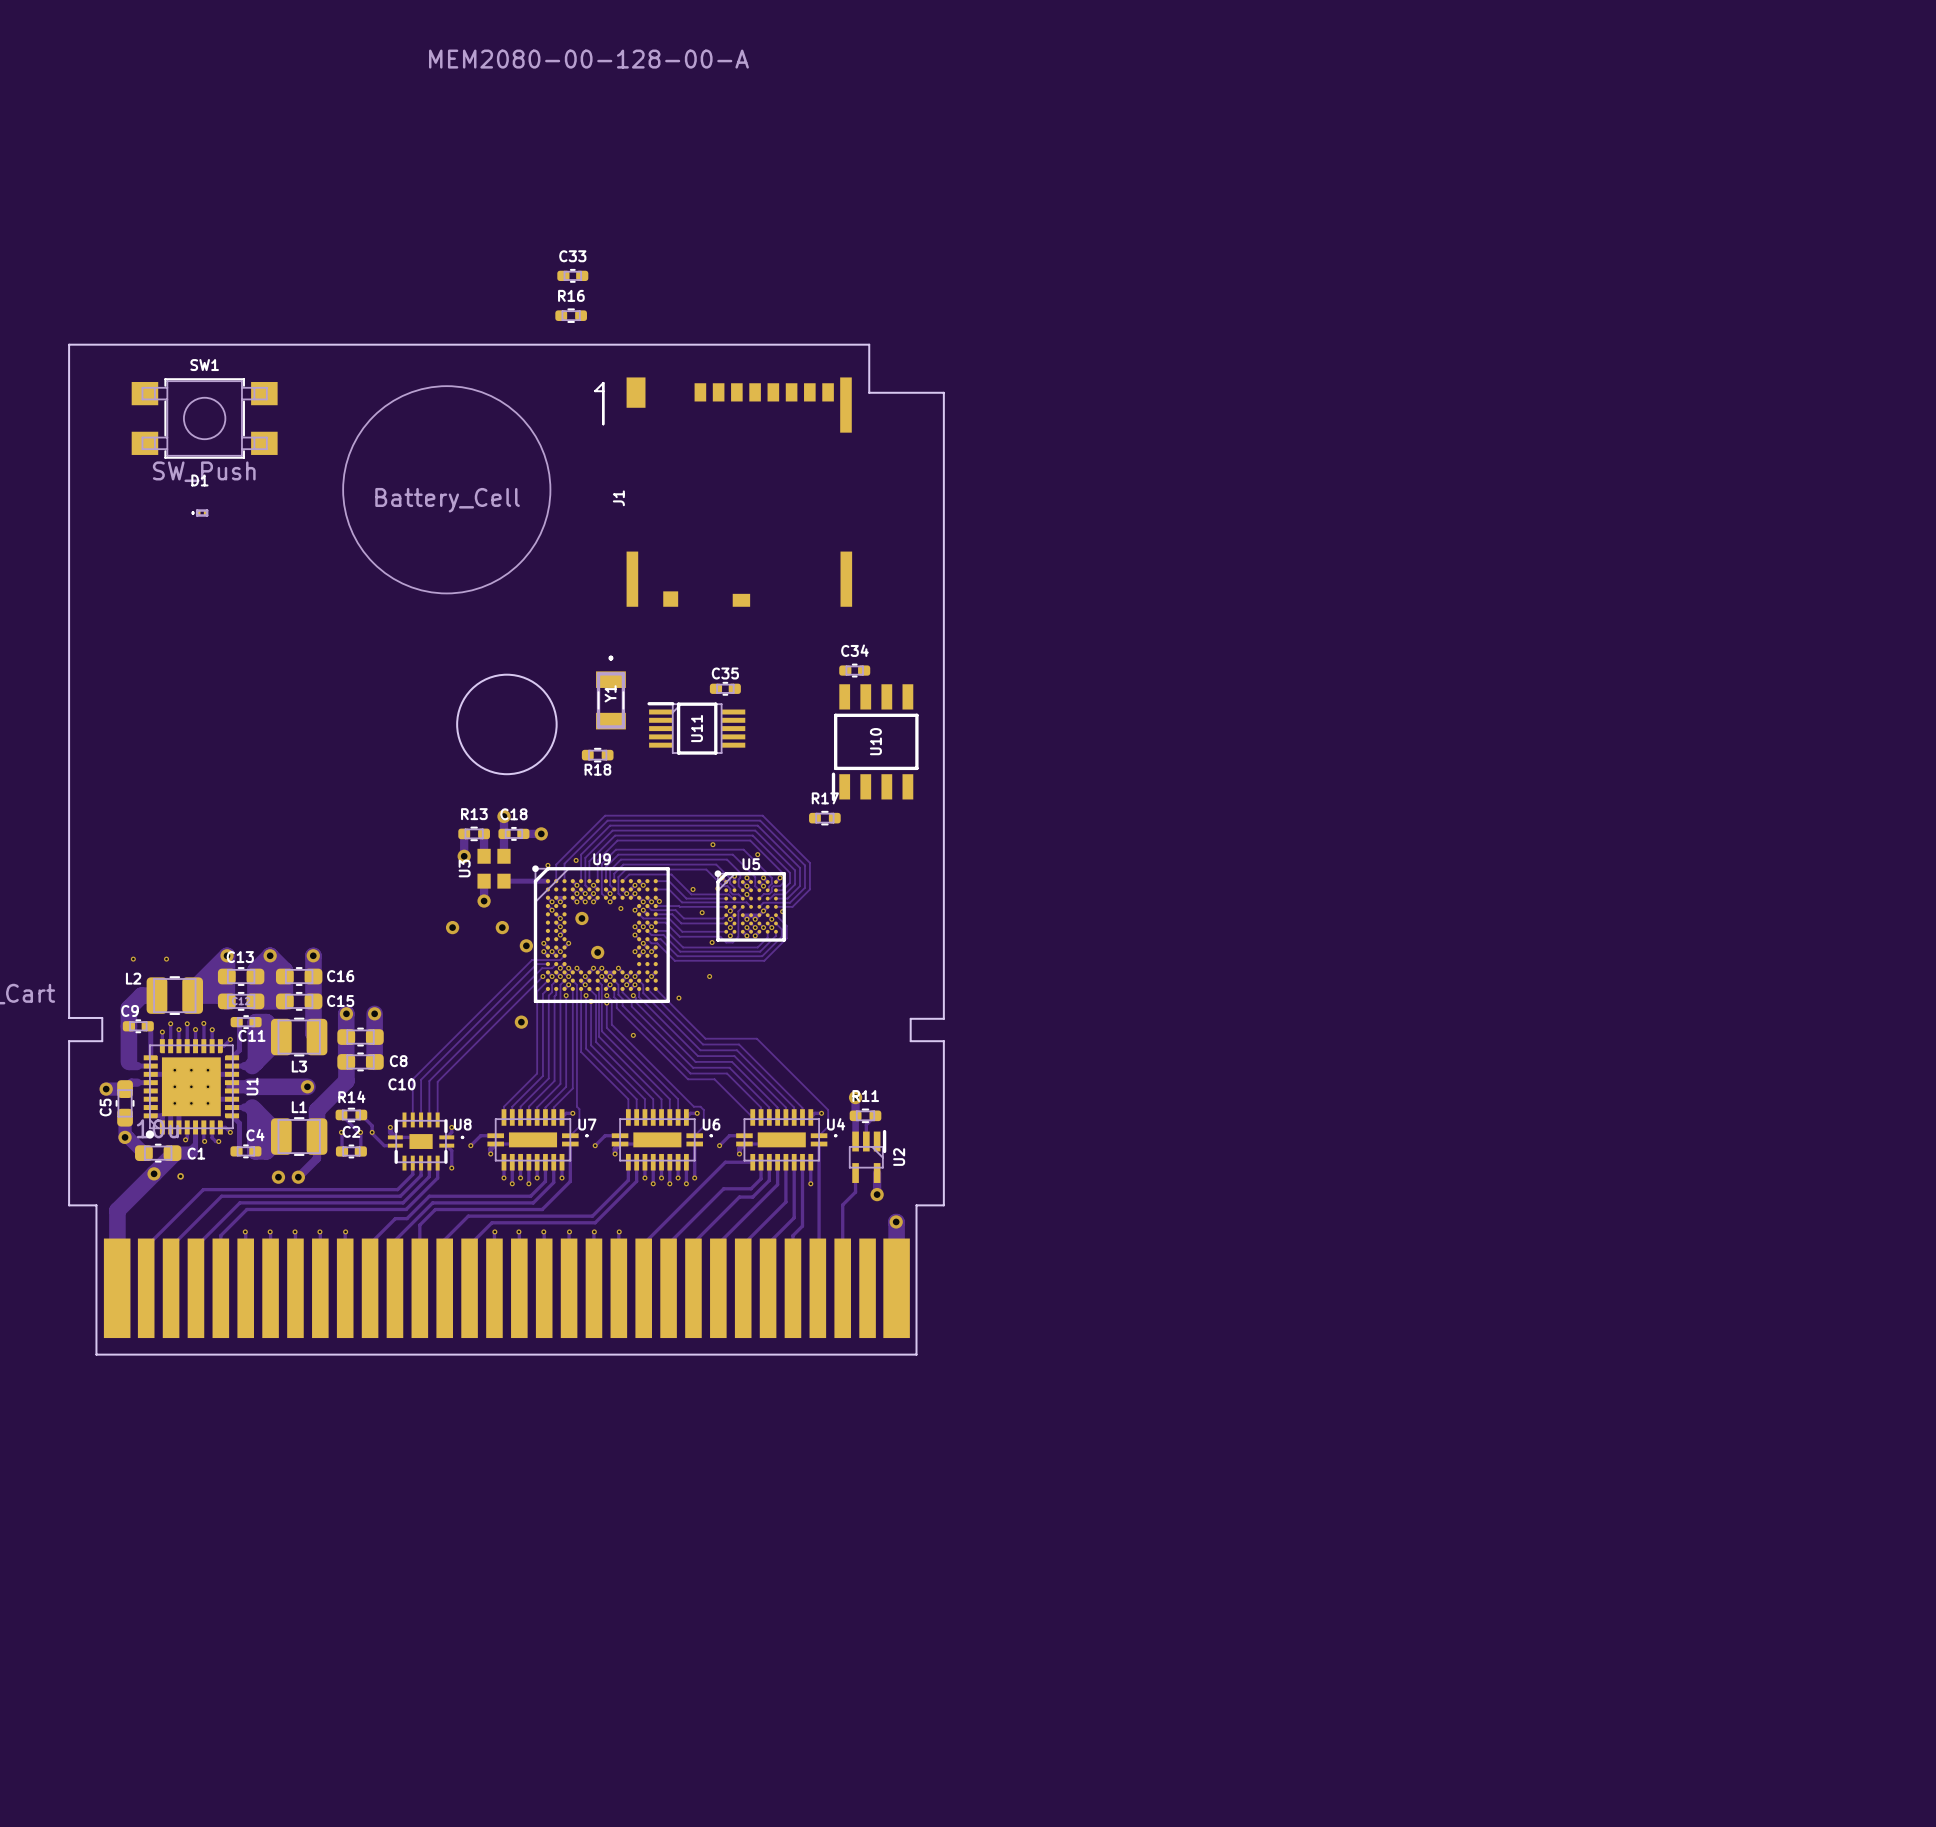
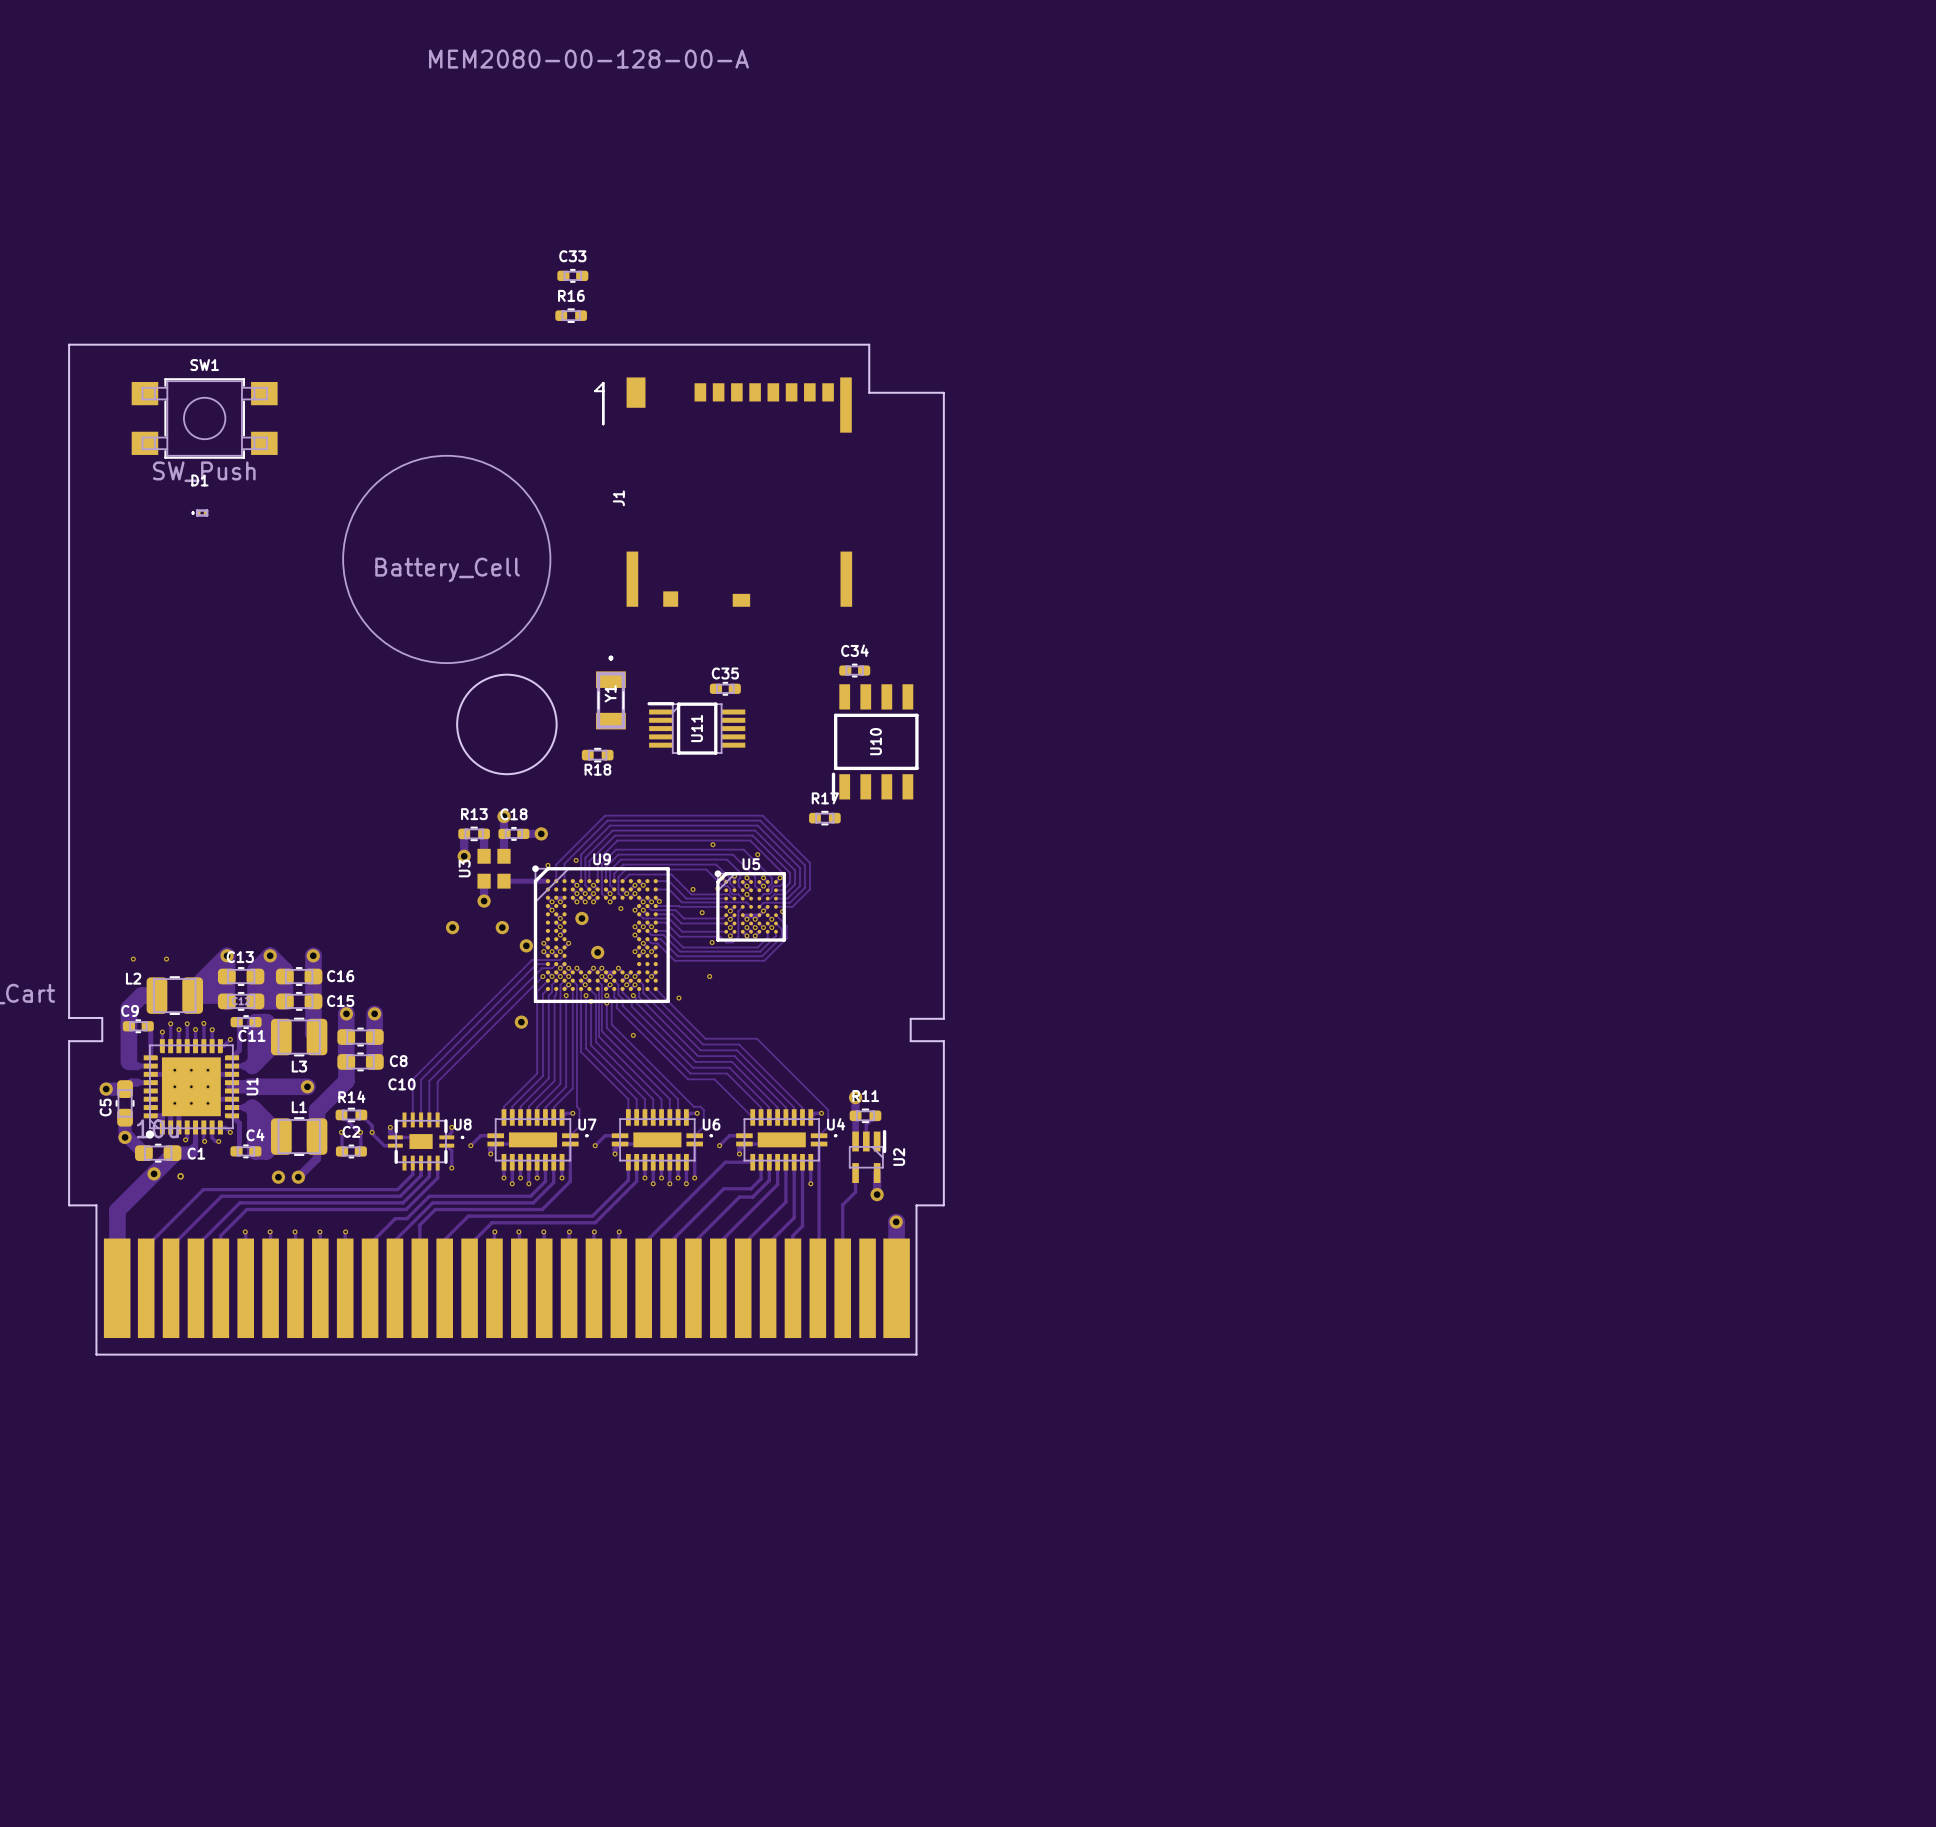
drawing position: (446, 489) -> (446, 559)

